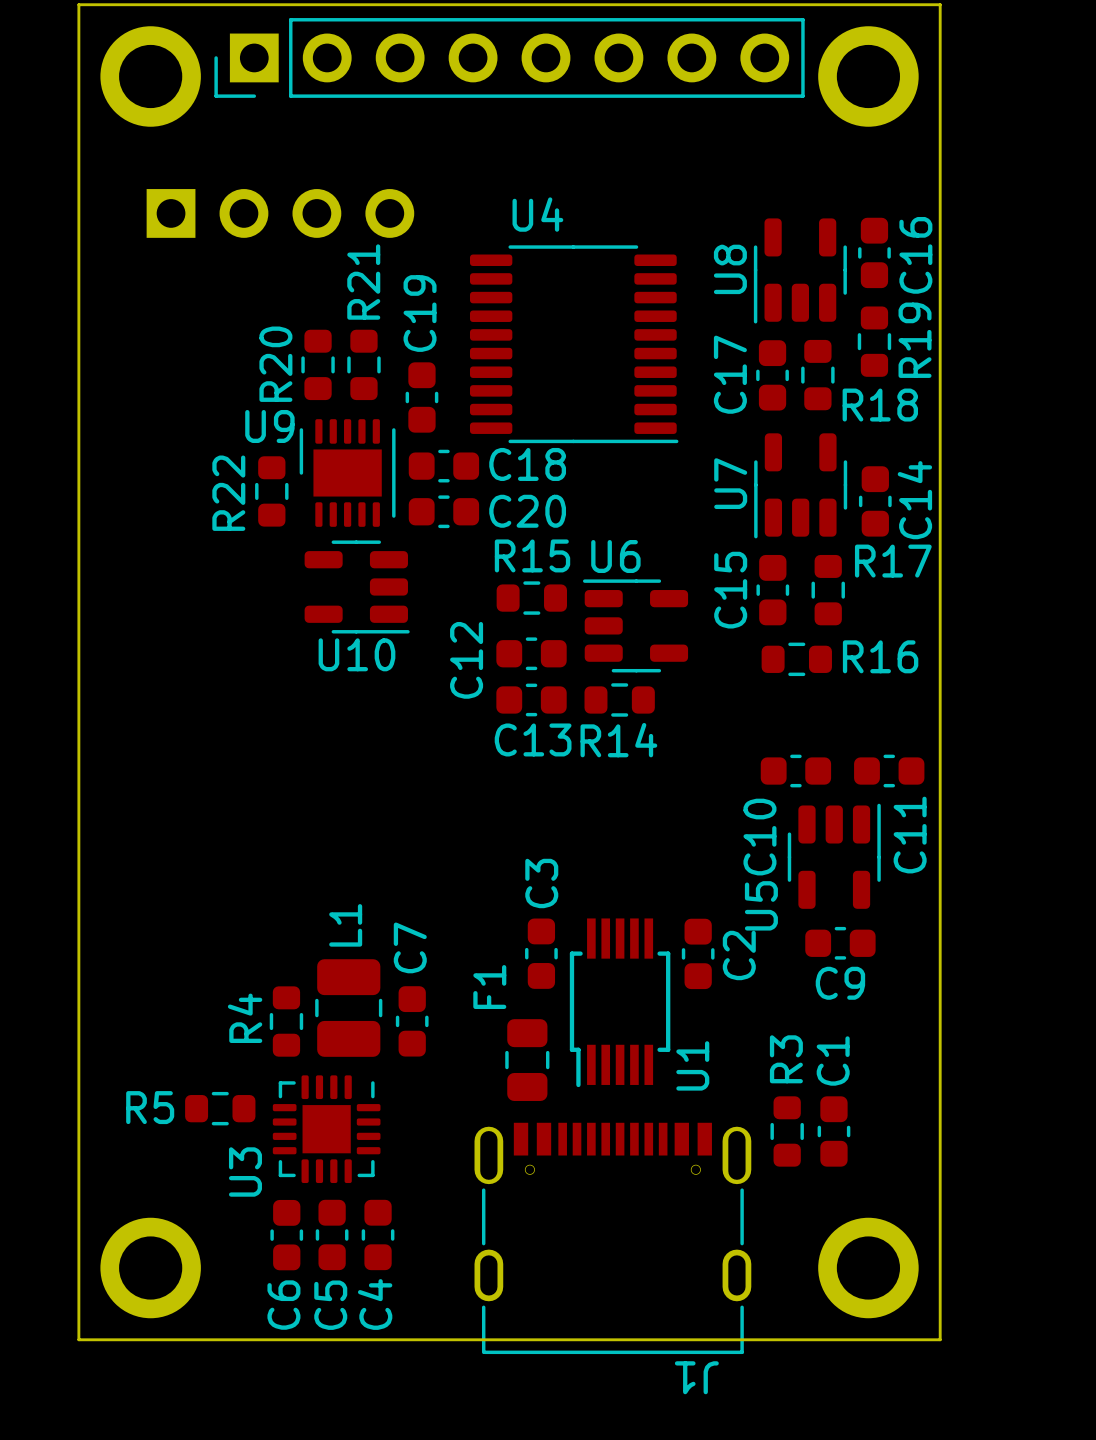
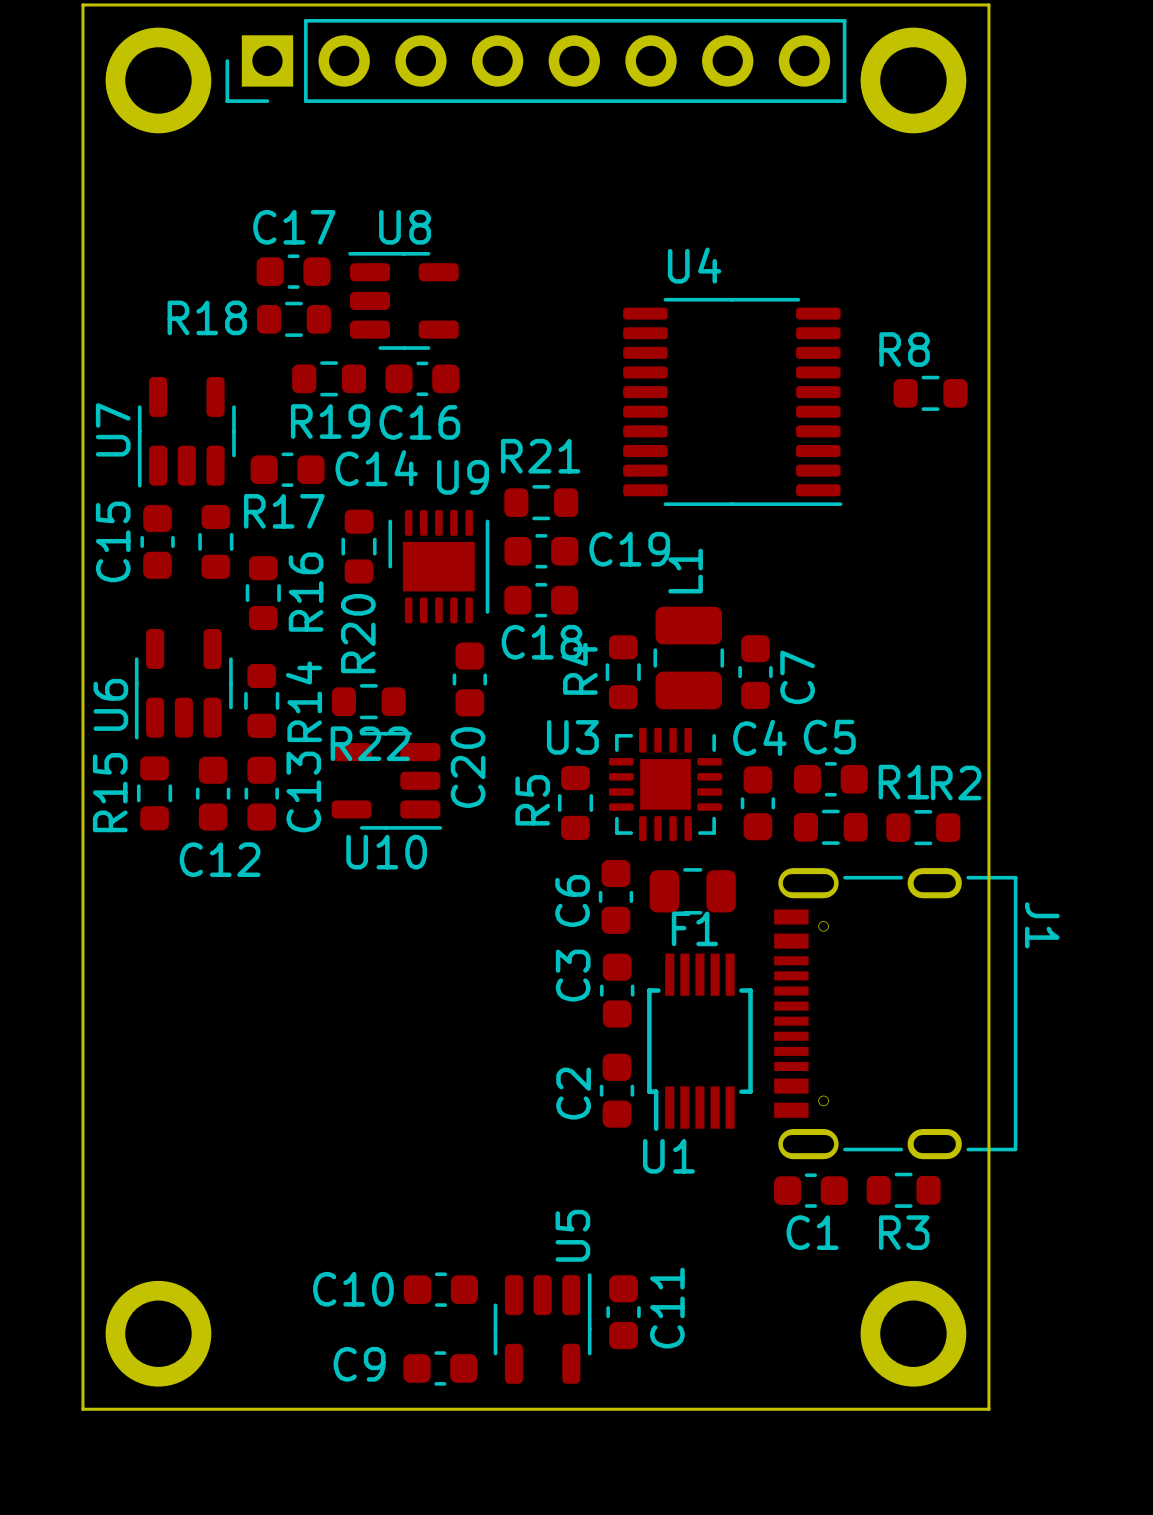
part: (280, 213) -> none
C16 rotation: 0° (874, 252) -> 90° clockwise (422, 378)
C16 position: (874, 252) -> (422, 378)
U8 rotation: 0° (800, 270) -> 90° clockwise (403, 300)
U8 position: (800, 270) -> (403, 300)
R19 rotation: 0° (874, 341) -> 90° clockwise (329, 378)
R19 position: (874, 341) -> (329, 378)
U4 position: (574, 344) -> (732, 401)
R20 name position: R20 (275, 364) -> R20 (358, 633)
R20 position: (318, 364) -> (358, 546)
R21 rotation: 0° (363, 364) -> 90° clockwise (541, 502)
R21 position: (363, 364) -> (541, 502)
R8: none -> (930, 393)
C17 rotation: 0° (772, 375) -> 90° clockwise (293, 271)
C17 position: (772, 375) -> (293, 271)
R18 rotation: 0° (817, 375) -> 90° clockwise (293, 319)
R18 position: (817, 375) -> (293, 319)
C19 rotation: 0° (421, 397) -> 90° clockwise (541, 551)
C19 position: (421, 397) -> (541, 551)
R18 name position: R18 (880, 405) -> R18 (207, 317)
U9 name position: U9 (269, 426) -> U9 (462, 477)
C18 name position: C18 (527, 464) -> C18 (541, 642)
C18 position: (443, 466) -> (541, 600)
U9 position: (347, 473) -> (438, 566)
U7 position: (800, 485) -> (186, 432)
R22 rotation: 0° (271, 491) -> 90° clockwise (368, 701)
R22 position: (271, 491) -> (368, 701)
R22 name position: R22 (228, 493) -> R22 (370, 743)
C14 rotation: 0° (875, 501) -> 90° clockwise (287, 469)
C14 position: (875, 501) -> (287, 469)
C20 rotation: 0° (443, 511) -> 90° clockwise (469, 679)
C20 position: (443, 511) -> (469, 679)
R15 name position: R15 (532, 555) -> R15 (110, 792)
U10 position: (357, 586) -> (386, 780)
C15 position: (772, 590) -> (157, 541)
R17 position: (828, 590) -> (215, 541)
R15 rotation: 0° (531, 598) -> 90° clockwise (154, 793)
R15 position: (531, 598) -> (154, 793)
U6 rotation: 0° (635, 625) -> 90° counterclockwise (183, 684)
U6 position: (635, 625) -> (183, 684)
C12 rotation: 0° (531, 653) -> 90° clockwise (213, 793)
C12 position: (531, 653) -> (213, 793)
R16 rotation: 0° (796, 659) -> 90° clockwise (263, 593)
R16 position: (796, 659) -> (263, 593)
C12 name position: C12 (466, 660) -> C12 (220, 859)
C13 rotation: 0° (531, 699) -> 90° clockwise (261, 793)
C13 position: (531, 699) -> (261, 793)
R14 rotation: 0° (619, 699) -> 90° clockwise (261, 700)
R14 position: (619, 699) -> (261, 700)
C13 name position: C13 (533, 739) -> C13 (303, 791)
R14 name position: R14 (618, 740) -> R14 (303, 701)
C10 position: (795, 771) -> (440, 1289)
C11 rotation: 0° (889, 771) -> 90° clockwise (623, 1312)
C11 position: (889, 771) -> (623, 1312)
R1: none -> (830, 827)
R2: none -> (923, 827)
C11 name position: C11 (910, 835) -> C11 (667, 1308)
C10 name rotation: 0° (759, 837) -> 90° clockwise (353, 1289)
U5 position: (834, 856) -> (542, 1328)
C3 name position: C3 (541, 883) -> C3 (573, 975)
U5 name position: U5 (761, 905) -> U5 (572, 1235)
C9 position: (840, 943) -> (440, 1368)
C7 name position: C7 (410, 947) -> C7 (797, 677)
C3 position: (541, 953) -> (617, 990)
C2 position: (698, 953) -> (616, 1090)
C2 name position: C2 (739, 955) -> C2 (573, 1093)
C9 name position: C9 (840, 983) -> C9 (359, 1364)
F1 name position: F1 (489, 987) -> F1 (694, 928)
U1 position: (620, 1002) -> (699, 1042)
L1 position: (348, 1008) -> (688, 658)
R4 position: (286, 1021) -> (623, 672)
C7 position: (412, 1021) -> (755, 672)
R3 name position: R3 (786, 1059) -> R3 (904, 1232)
F1 rotation: 0° (527, 1060) -> 90° clockwise (692, 891)
F1 position: (527, 1060) -> (692, 891)
C1 name position: C1 (833, 1060) -> C1 (812, 1232)
U1 name rotation: 0° (692, 1065) -> 90° clockwise (668, 1156)
R5 rotation: 0° (220, 1108) -> 90° clockwise (575, 802)
R5 position: (220, 1108) -> (575, 802)
U3 position: (326, 1129) -> (665, 784)
R3 rotation: 0° (787, 1131) -> 90° clockwise (903, 1190)
R3 position: (787, 1131) -> (903, 1190)
C1 rotation: 0° (833, 1131) -> 90° clockwise (810, 1190)
C1 position: (833, 1131) -> (810, 1190)
U3 name rotation: 0° (245, 1172) -> 90° clockwise (572, 737)
U3 name position: U3 (245, 1172) -> U3 (572, 737)
C5 rotation: 0° (332, 1234) -> 90° clockwise (830, 779)
C5 position: (332, 1234) -> (830, 779)
C4 position: (378, 1234) -> (757, 803)
C6 position: (286, 1235) -> (615, 896)
J1 rotation: 0° (612, 1238) -> 90° counterclockwise (895, 1013)
J1 position: (612, 1238) -> (895, 1013)
C4 name rotation: 0° (375, 1304) -> 90° clockwise (759, 737)
C4 name position: C4 (375, 1304) -> C4 (759, 737)
C6 name position: C6 (283, 1305) -> C6 (572, 900)
C5 name position: C5 (330, 1305) -> C5 (829, 737)

